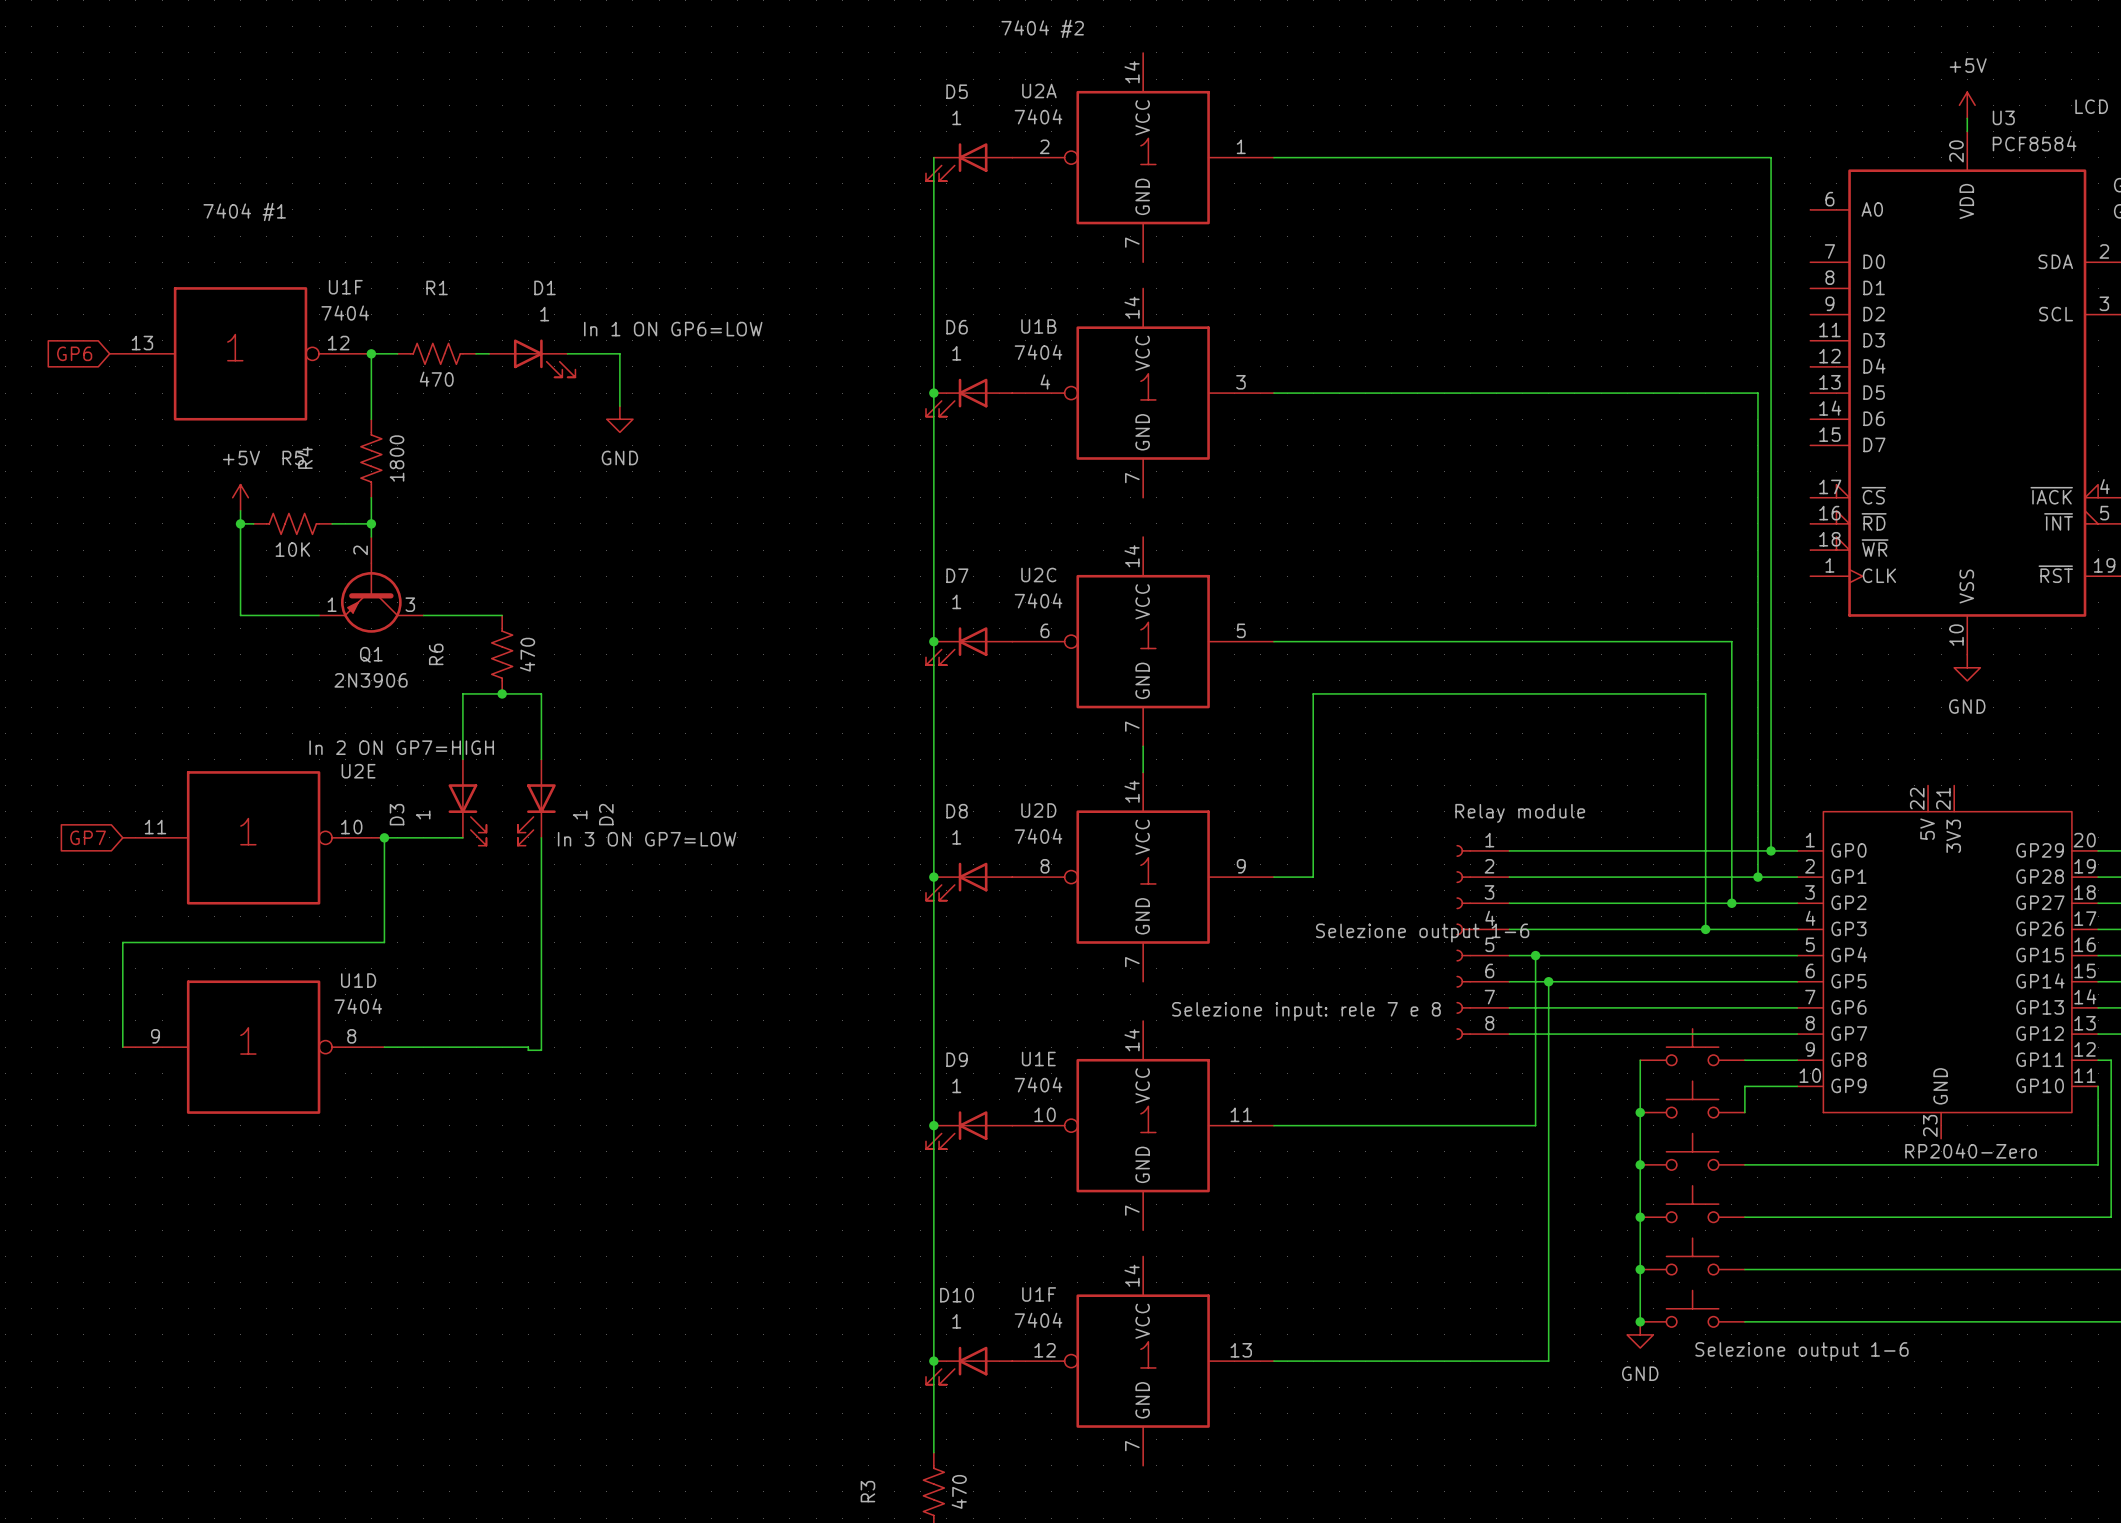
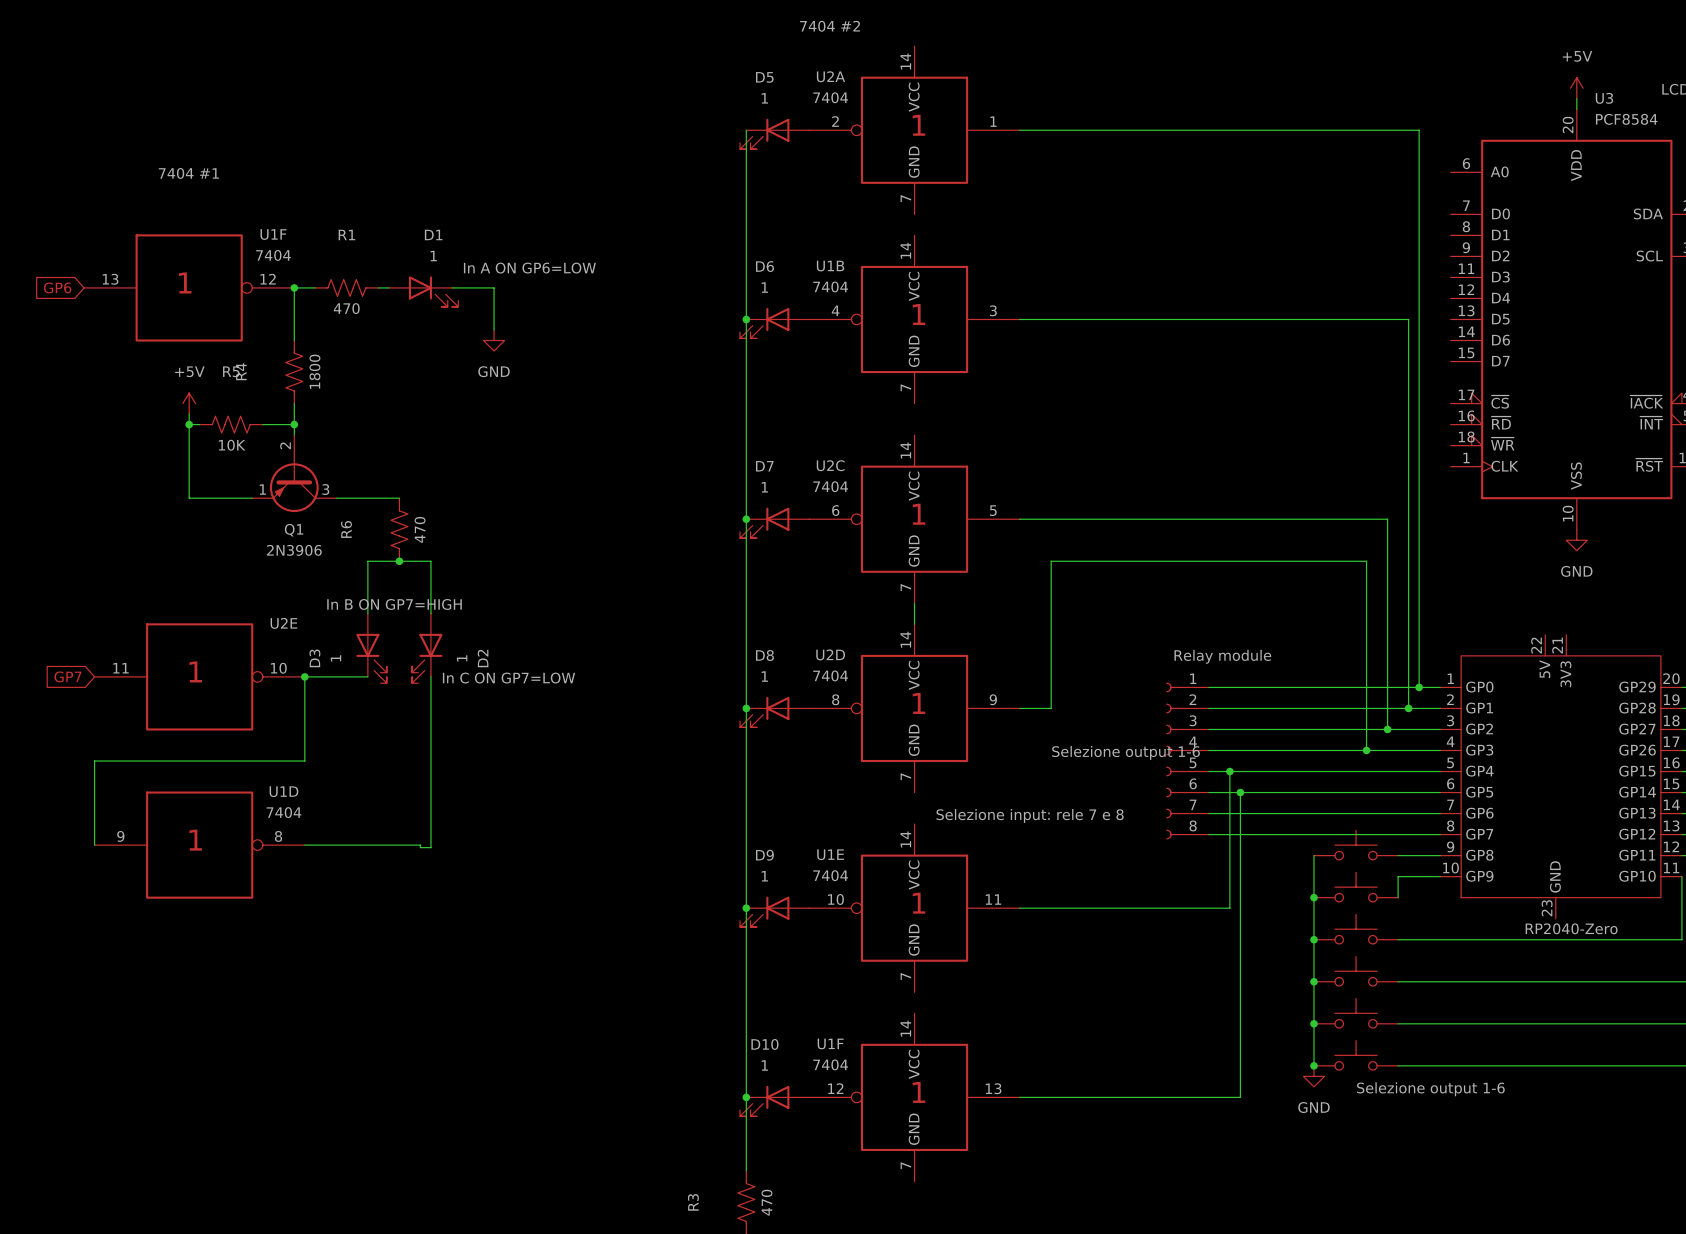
label: In 1 ON GP6=LOW (673, 329) -> In A ON GP6=LOW (529, 268)
label: In 2 ON GP7=HIGH (401, 747) -> In B ON GP7=HIGH (394, 604)
label: In 3 ON GP7=LOW (647, 839) -> In C ON GP7=LOW (509, 678)

